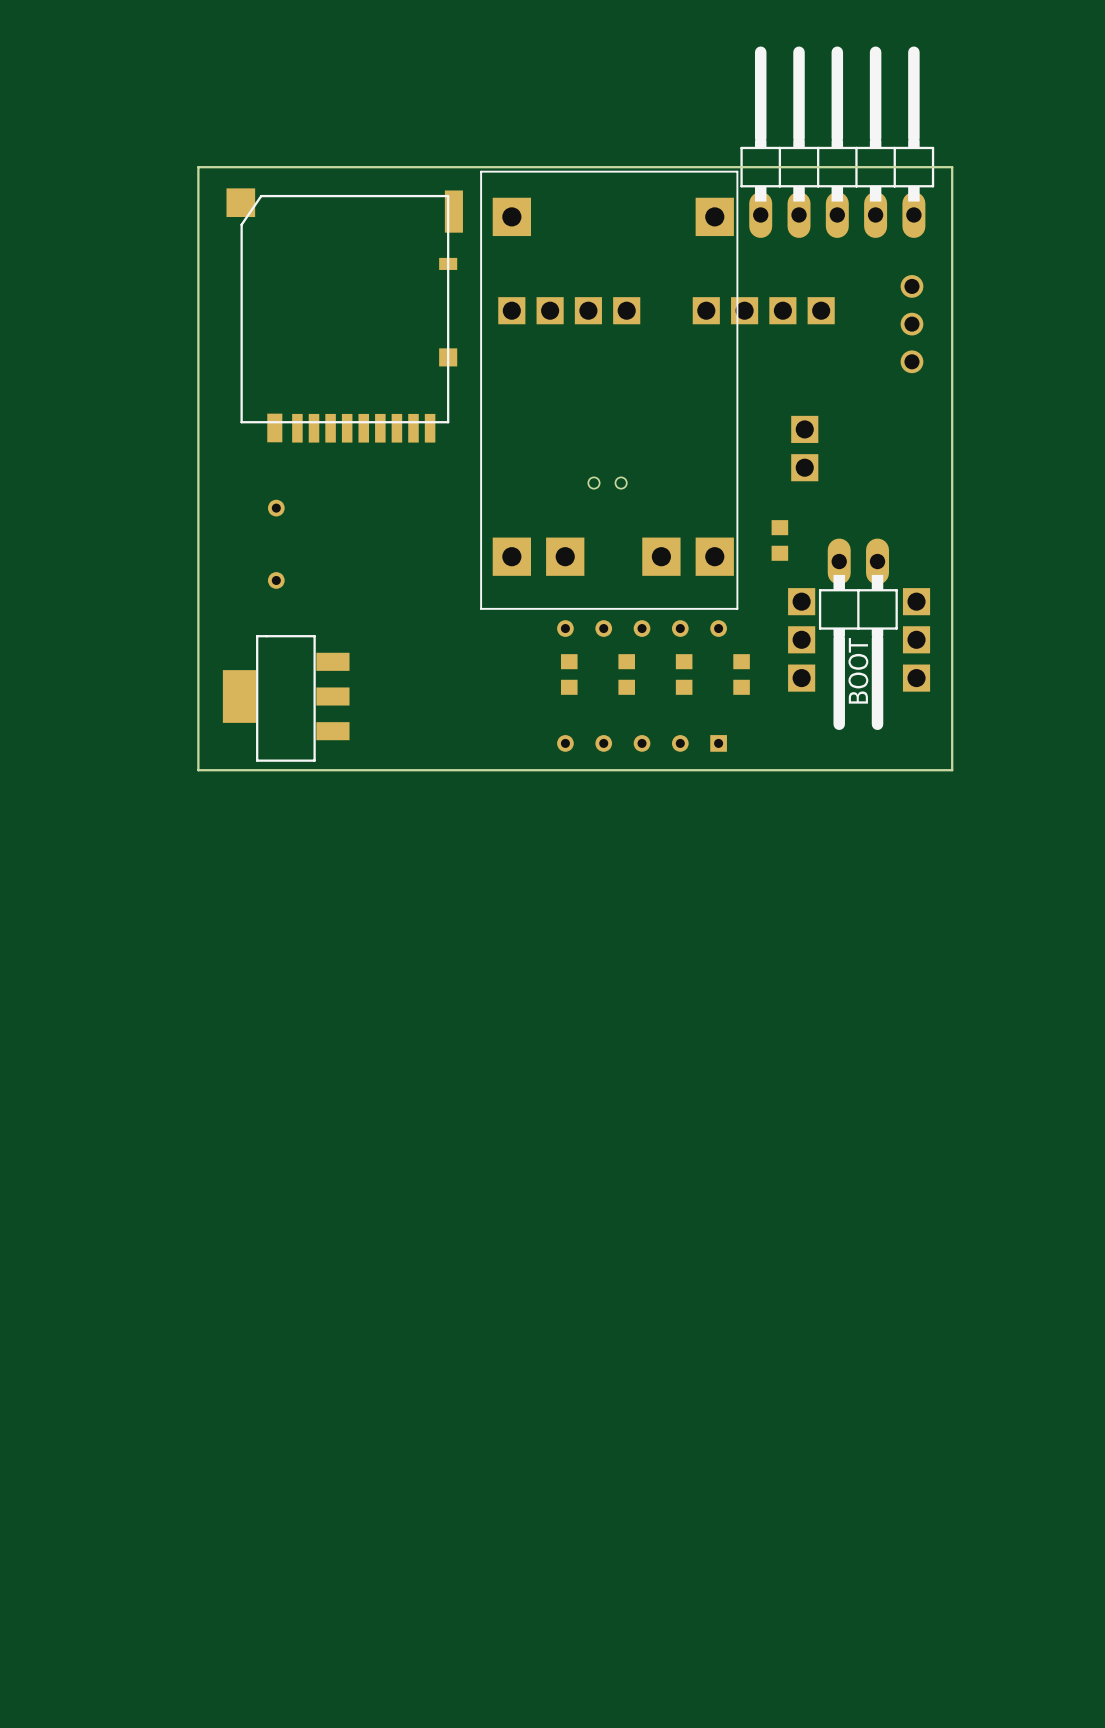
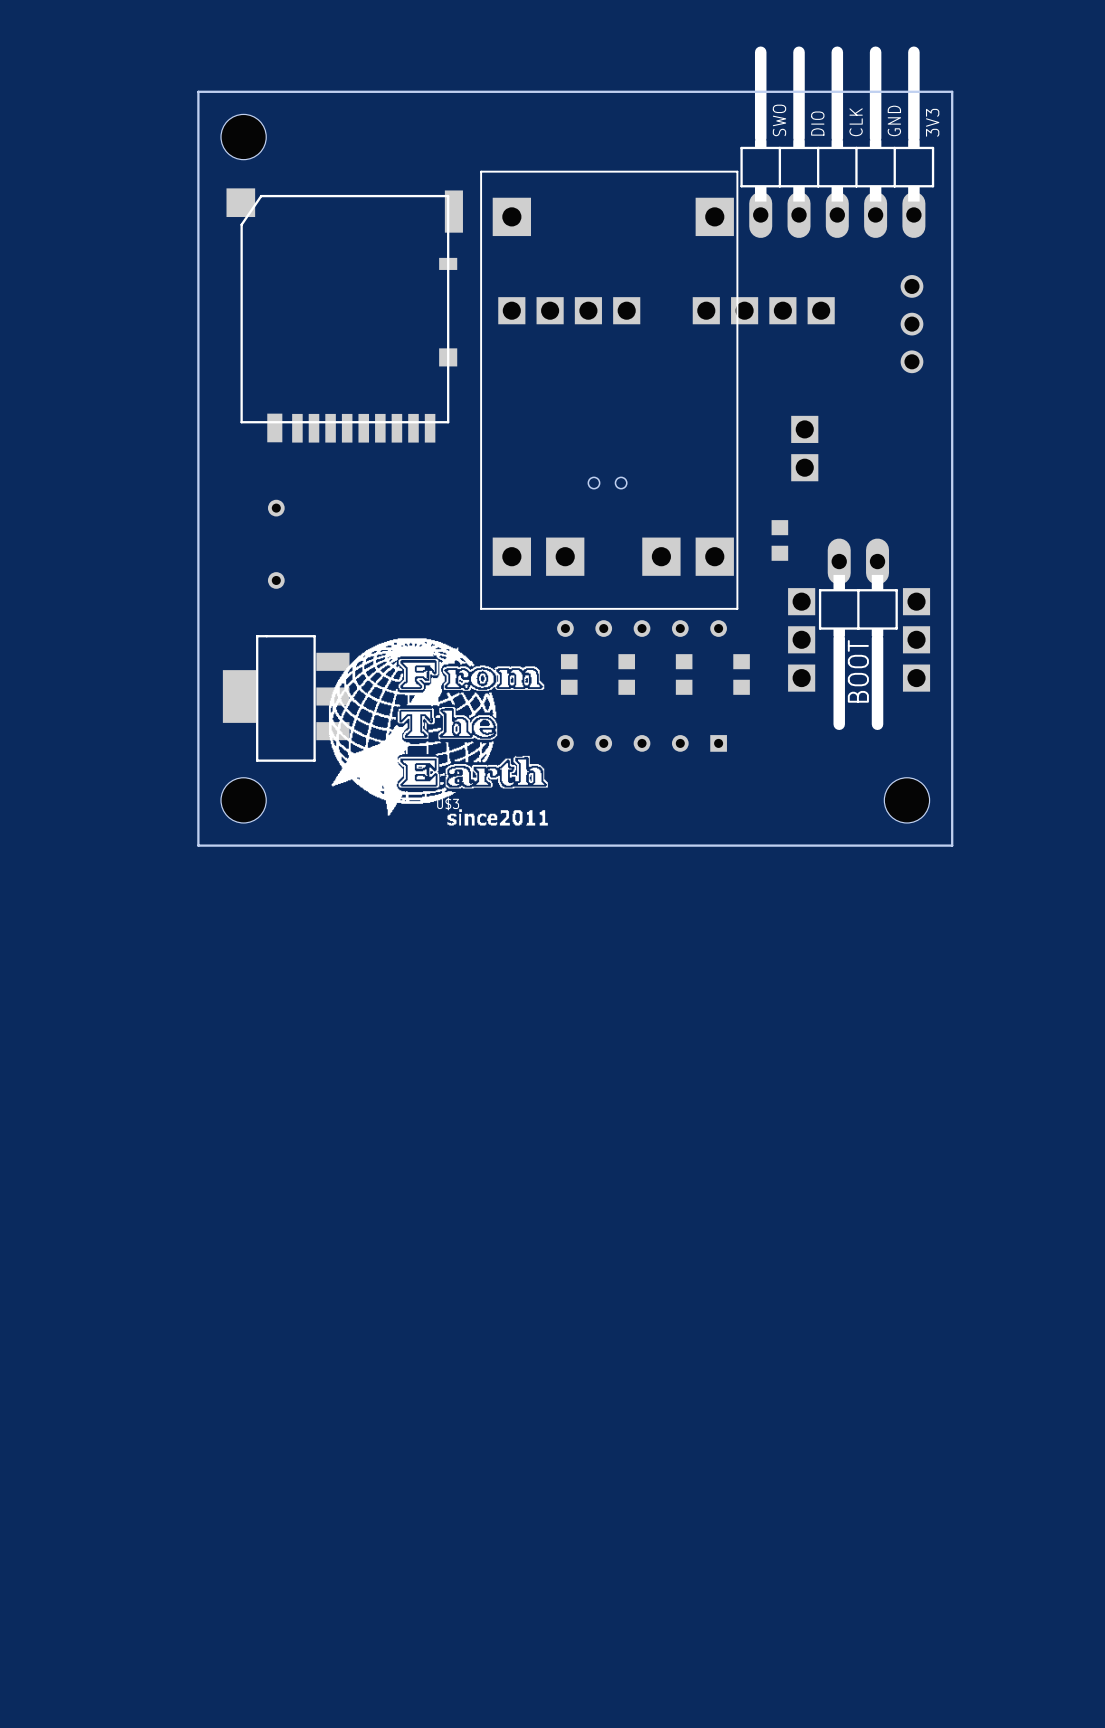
text: none -> SWO (779, 120)
text: none -> GND (894, 120)
text: none -> CLK (856, 122)
text: none -> 3V3 (932, 122)
text: none -> DIO (817, 123)
hole: none -> (243, 137)
board edge: (952, 167) (198, 167) -> (952, 167) (952, 91) (198, 91) (198, 167)
U$3: none -> (438, 731)
board edge: (952, 770) (198, 770) -> (952, 770) (952, 845) (198, 845) (198, 770)
hole: none -> (243, 800)
hole: none -> (906, 800)

